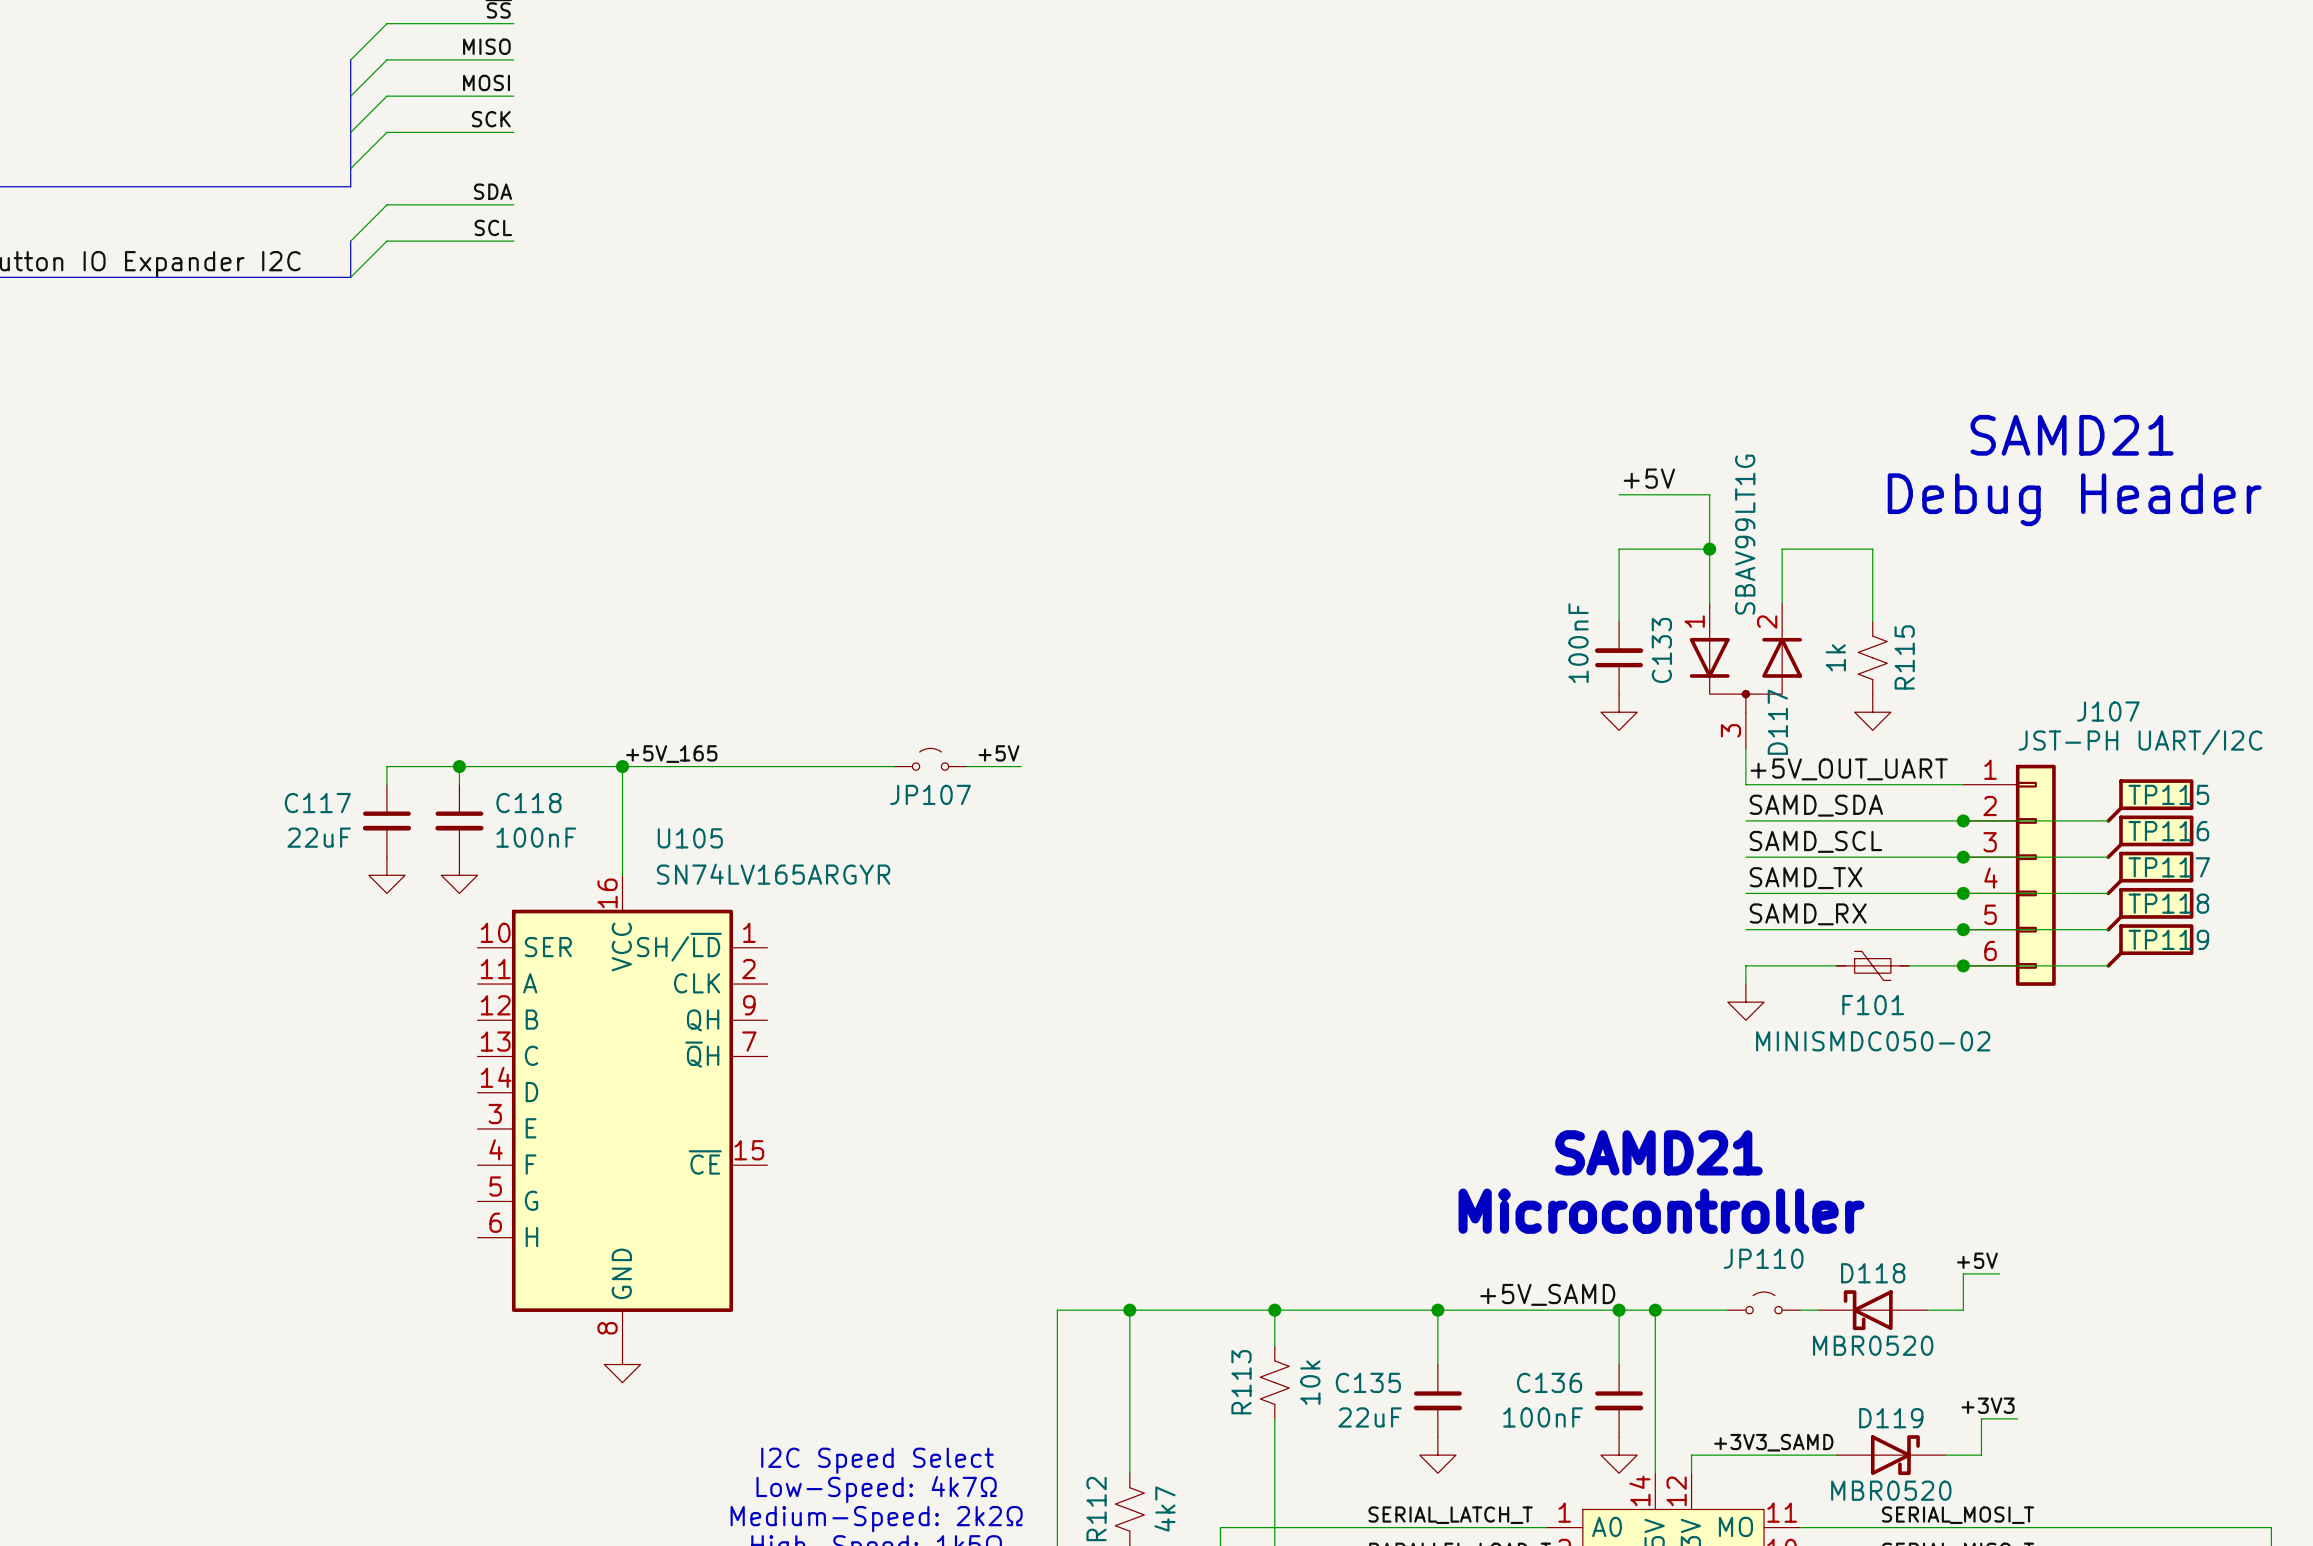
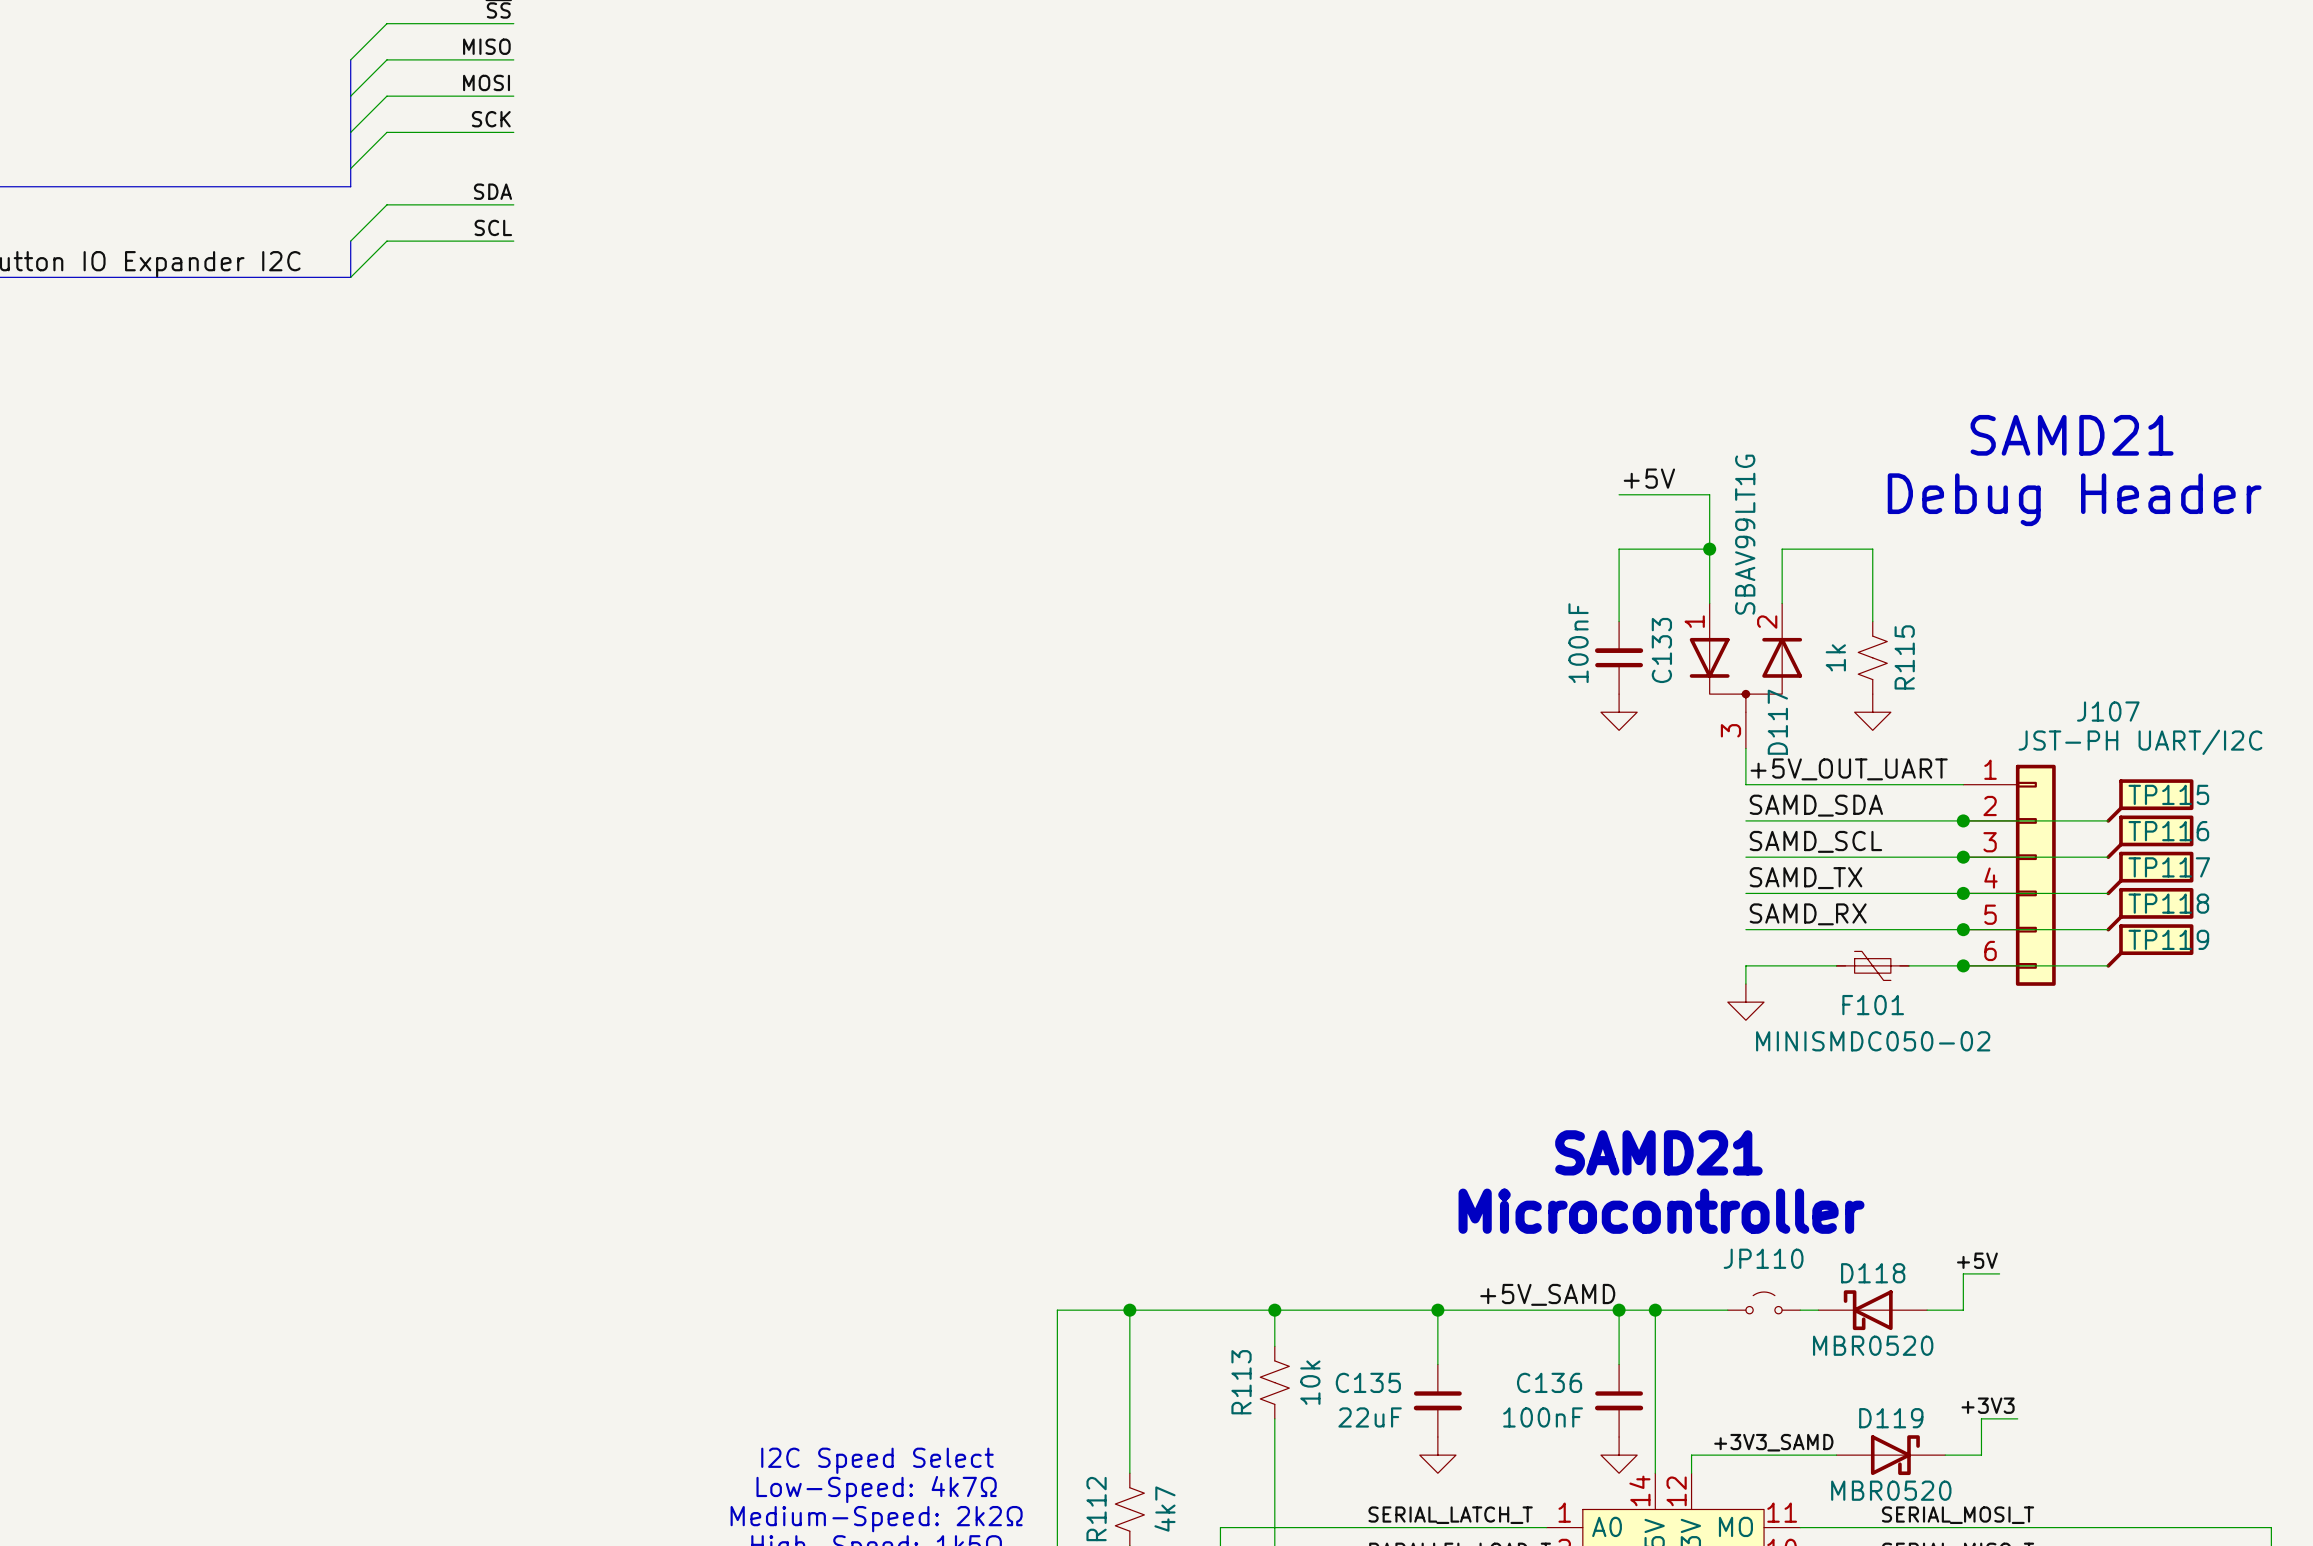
label: +5V (998, 753) -> none
label: +5V_165 (671, 754) -> none
JP107: (930, 759) -> none
wire: (459, 766) (459, 784) -> none
junction: (459, 766) -> none
wire: (622, 766) (622, 875) -> none
junction: (622, 766) -> none
wire: (894, 766) (386, 766) (386, 784) -> none
wire: (966, 766) (1021, 766) -> none
C117: 22uF (386, 820) -> none
C118: 100nF (459, 820) -> none
power symbol: (386, 875) -> none
power symbol: (459, 875) -> none
U105: SN74LV165ARGYR (622, 1110) -> none
power symbol: (622, 1364) -> none

